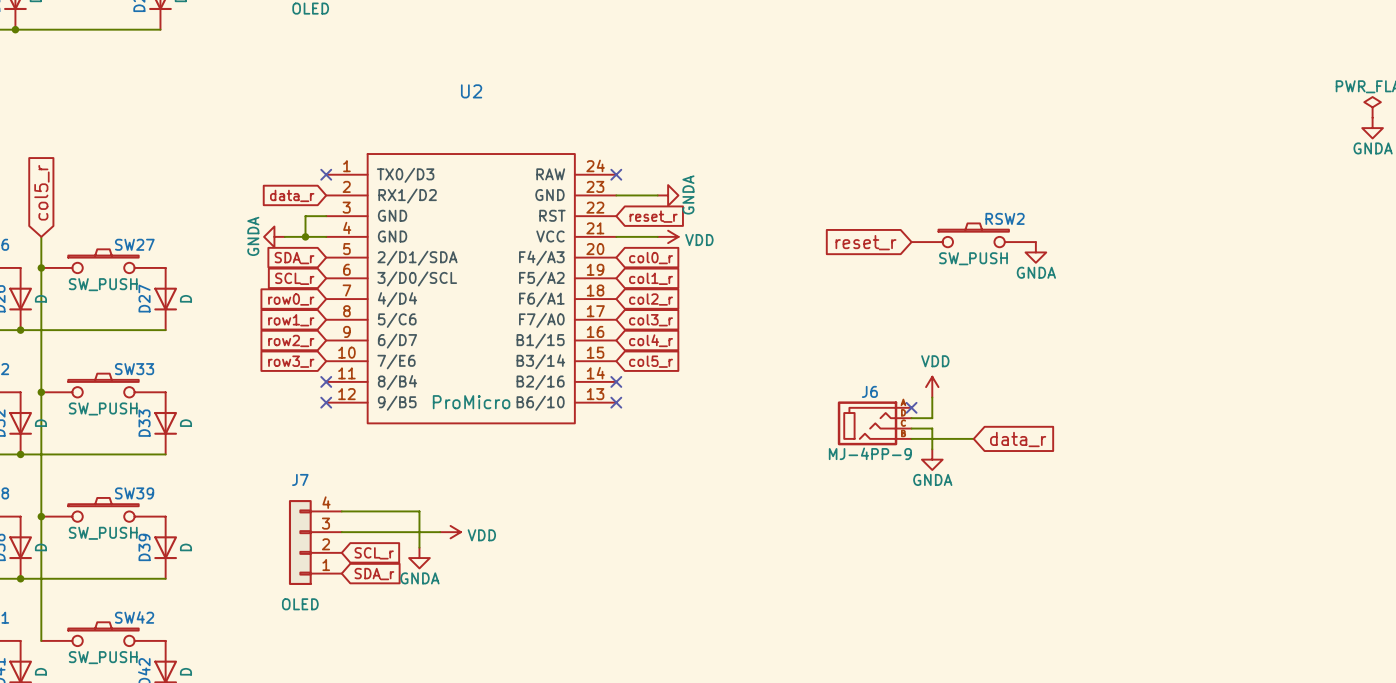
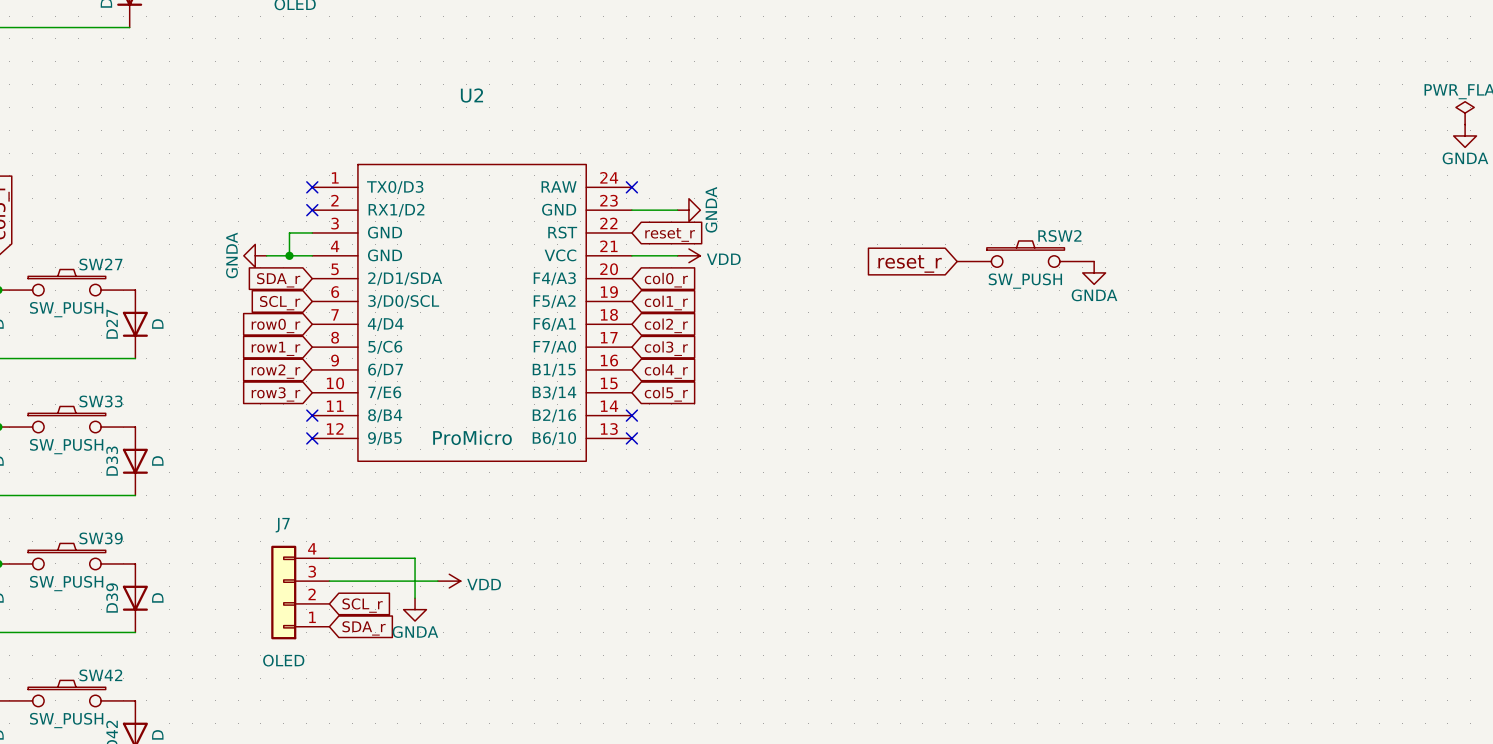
global label: data_r (292, 195) -> none
no-connect mark: none -> (312, 210)
power symbol: VDD (932, 387) -> none
wire: (932, 397) (932, 418) (911, 418) -> none
no-connect mark: (911, 407) -> none
J6: MJ-4PP-9 (874, 423) -> none
wire: (911, 428) (932, 428) (932, 449) -> none
wire: (911, 438) (973, 438) -> none
global label: data_r (1018, 439) -> none
power symbol: GNDA (932, 459) -> none

